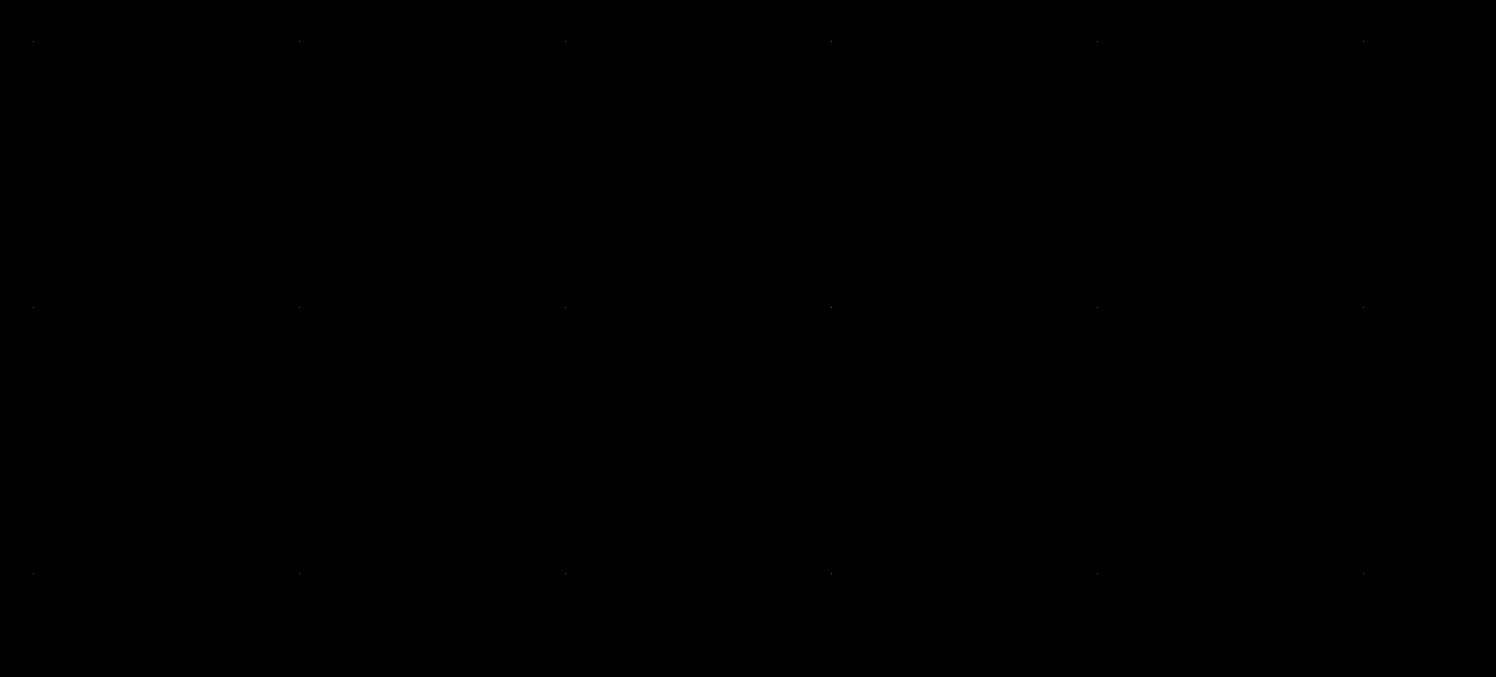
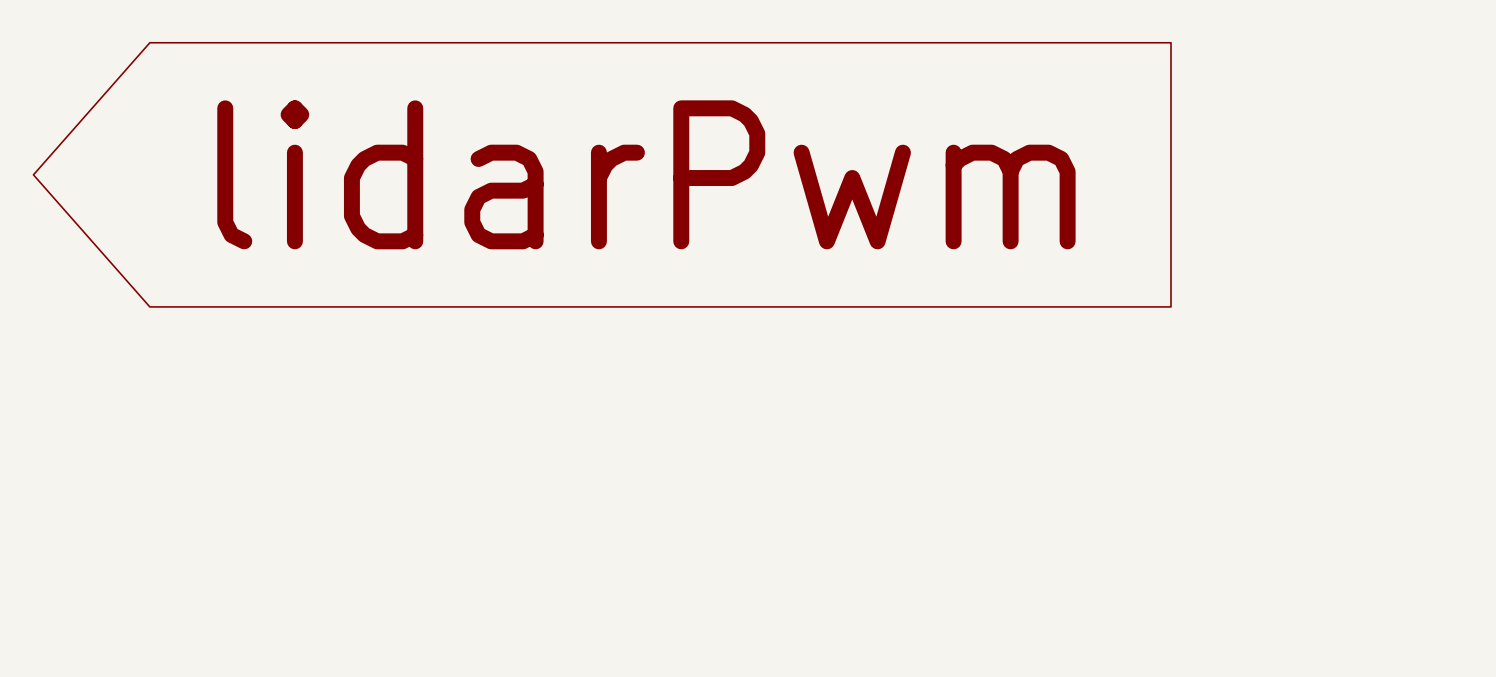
global label: none -> lidarPwm (646, 174)

